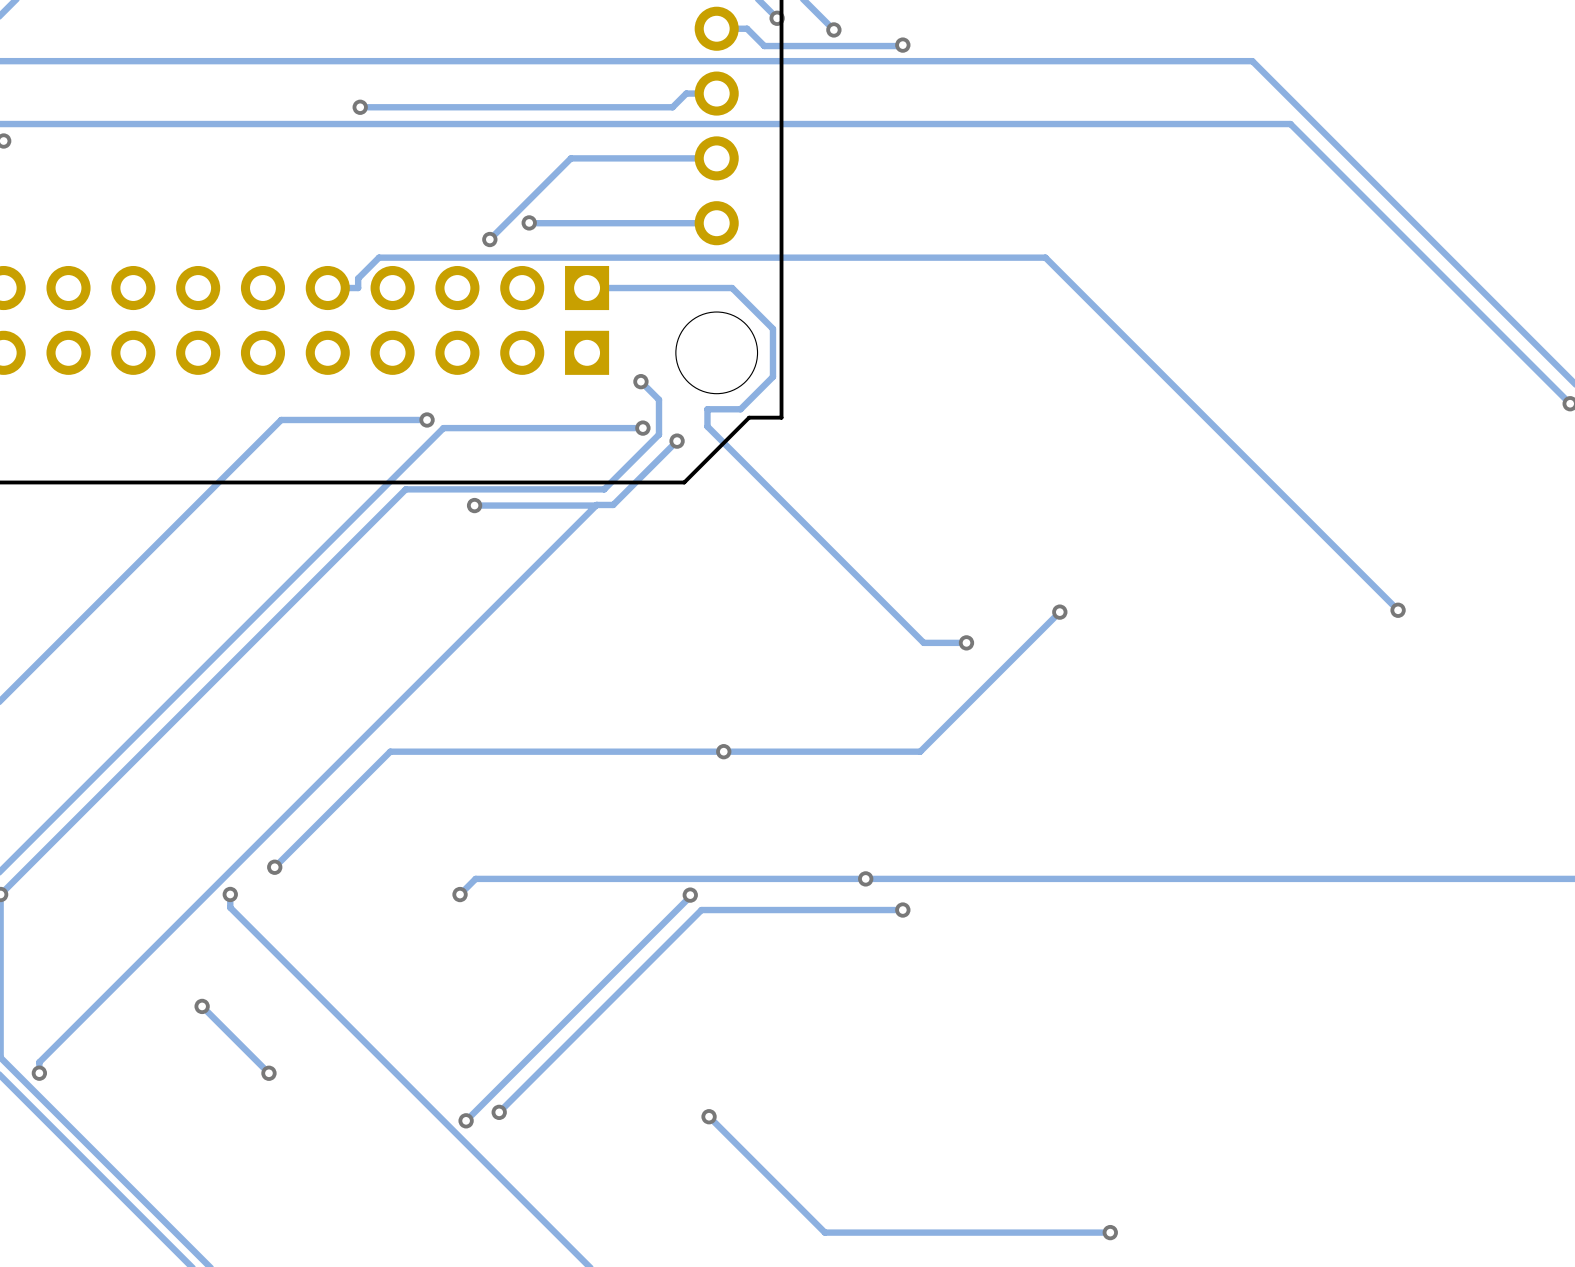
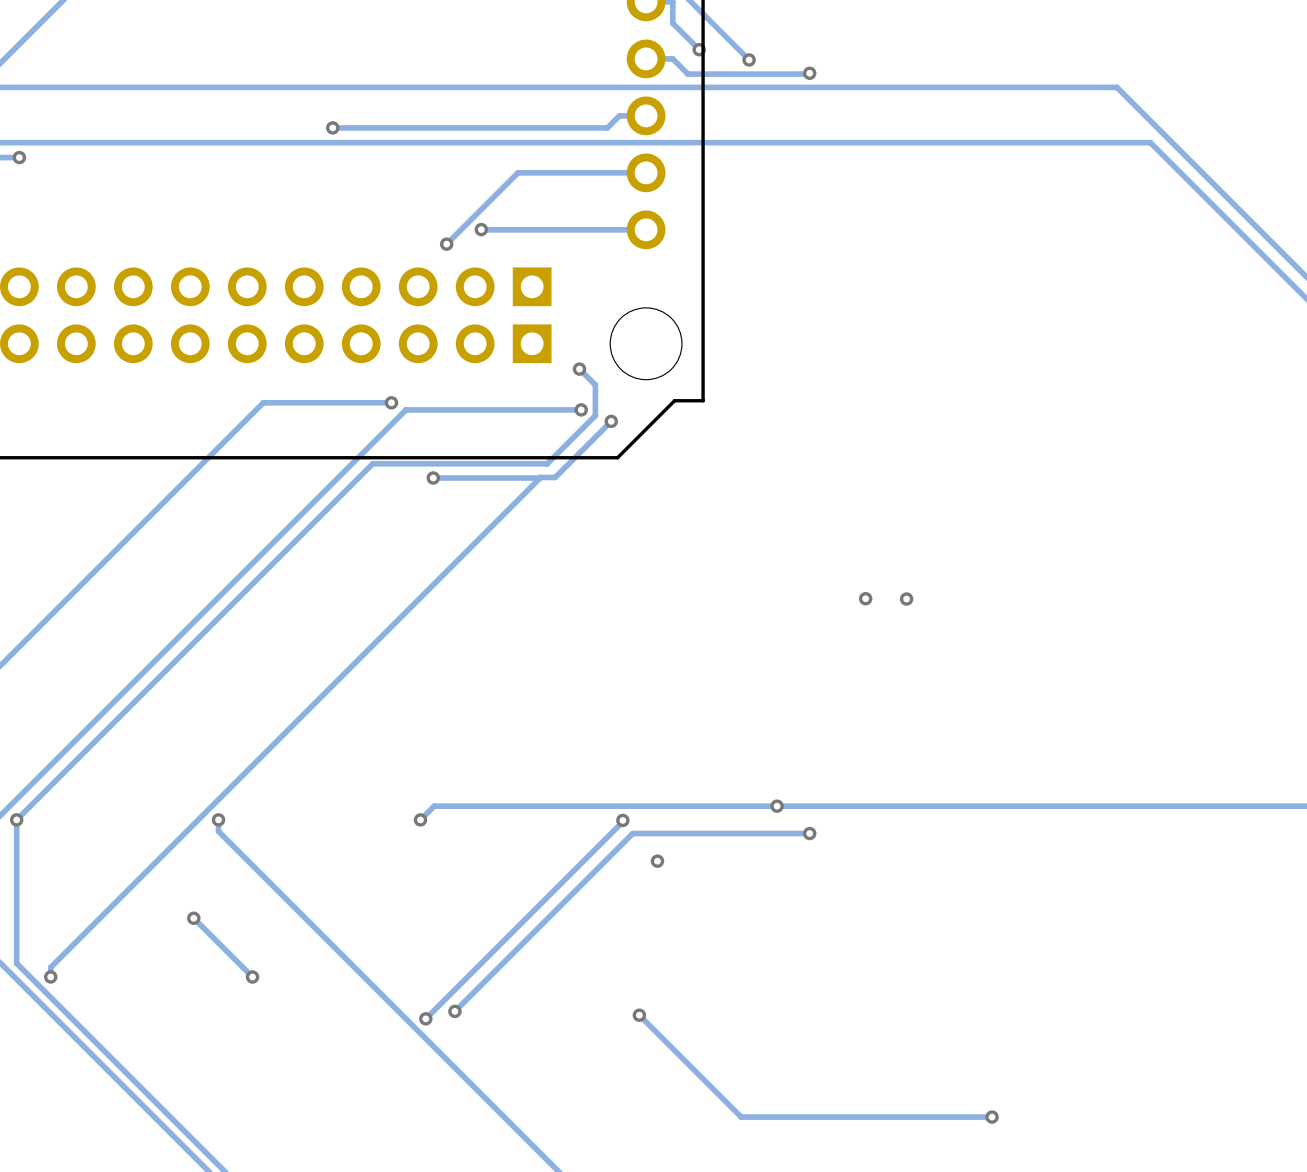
track: (327, 288) (358, 288) (358, 278) (379, 257) (1045, 257) (1398, 610) -> none
track: (587, 288) (732, 288) (772, 328) (772, 376) (740, 409) (707, 409) (707, 426) (923, 642) (966, 642) -> none
via: (1398, 610) -> none
track: (1059, 612) (920, 751) (390, 751) (274, 867) -> none
via position: (1059, 612) -> (906, 599)
via: (723, 751) -> none
via: (274, 867) -> none
via: none -> (657, 861)

